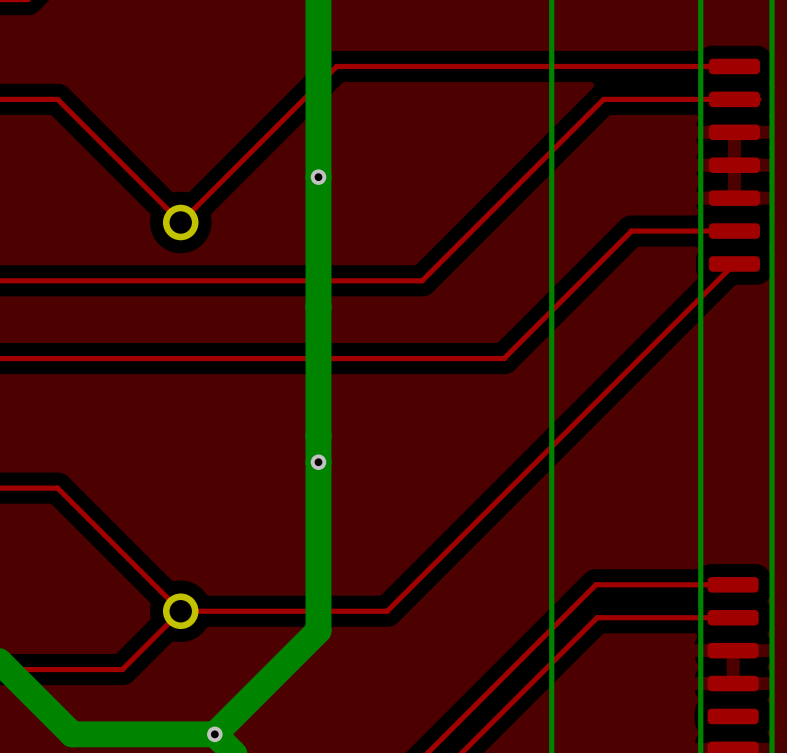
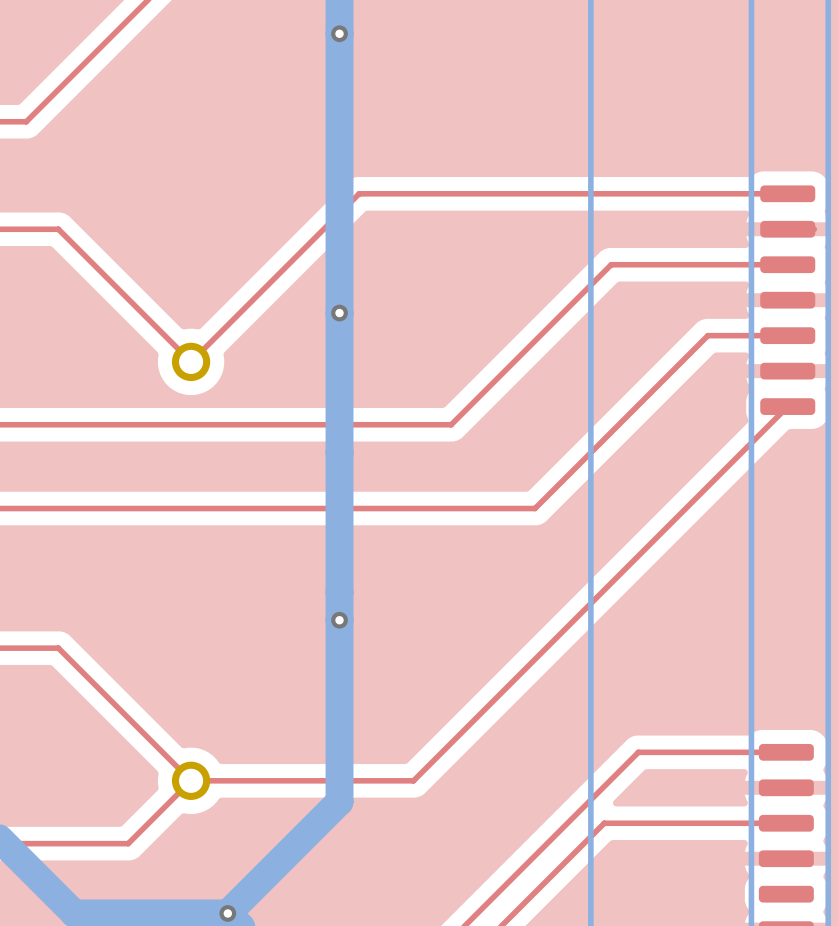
top track: (734, 99) (603, 99) (570, 132) -> (787, 264) (611, 264)
top track: (734, 231) (631, 231) (504, 358) (499, 358) -> (787, 335) (707, 335) (535, 508)
top track: (733, 617) (597, 617) (564, 650) -> (786, 823) (604, 823)

